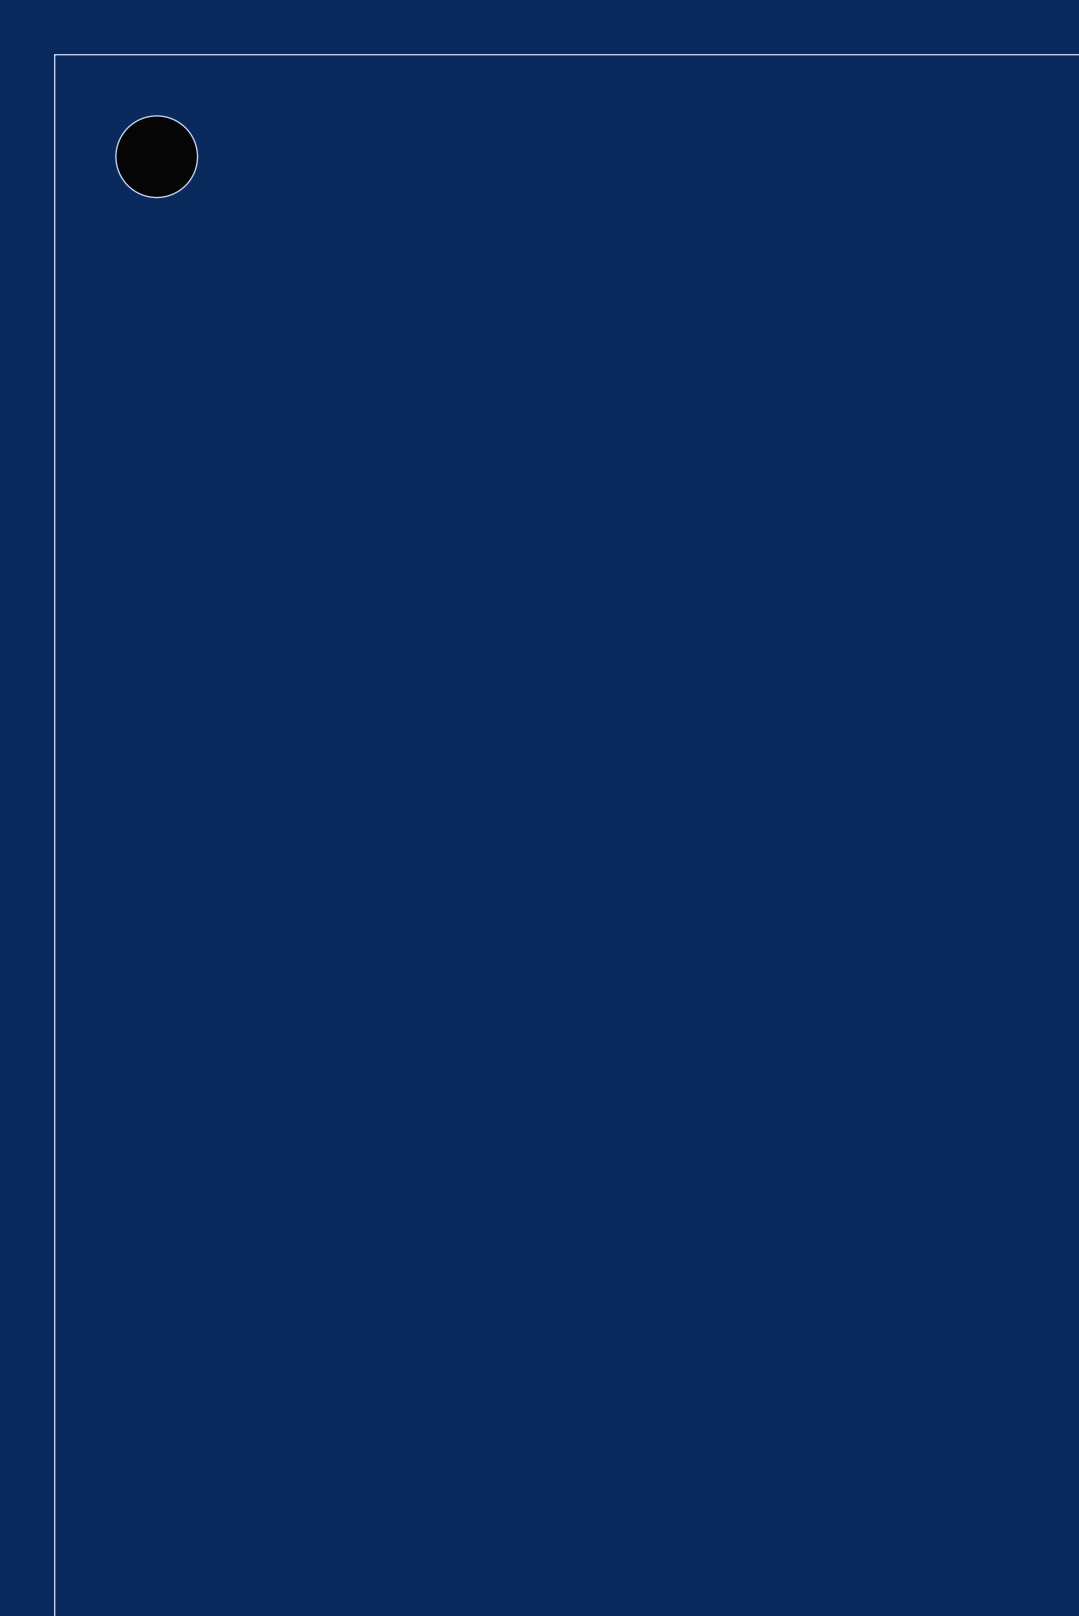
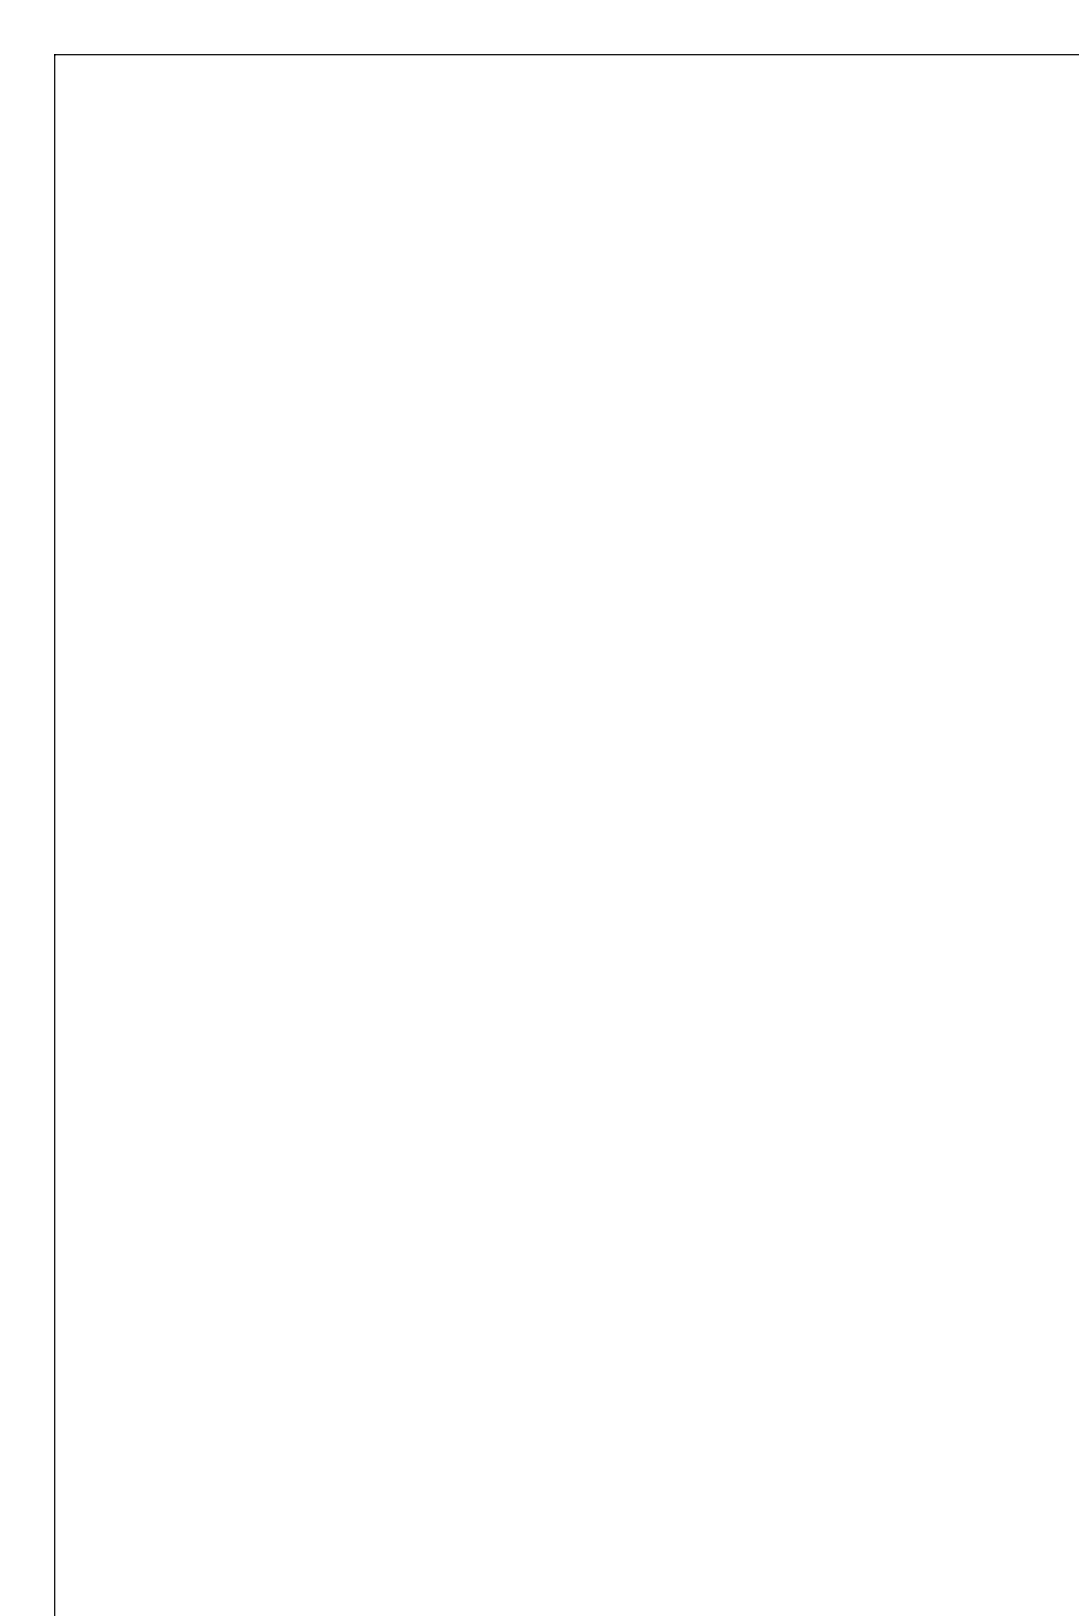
hole: (156, 156) -> none

